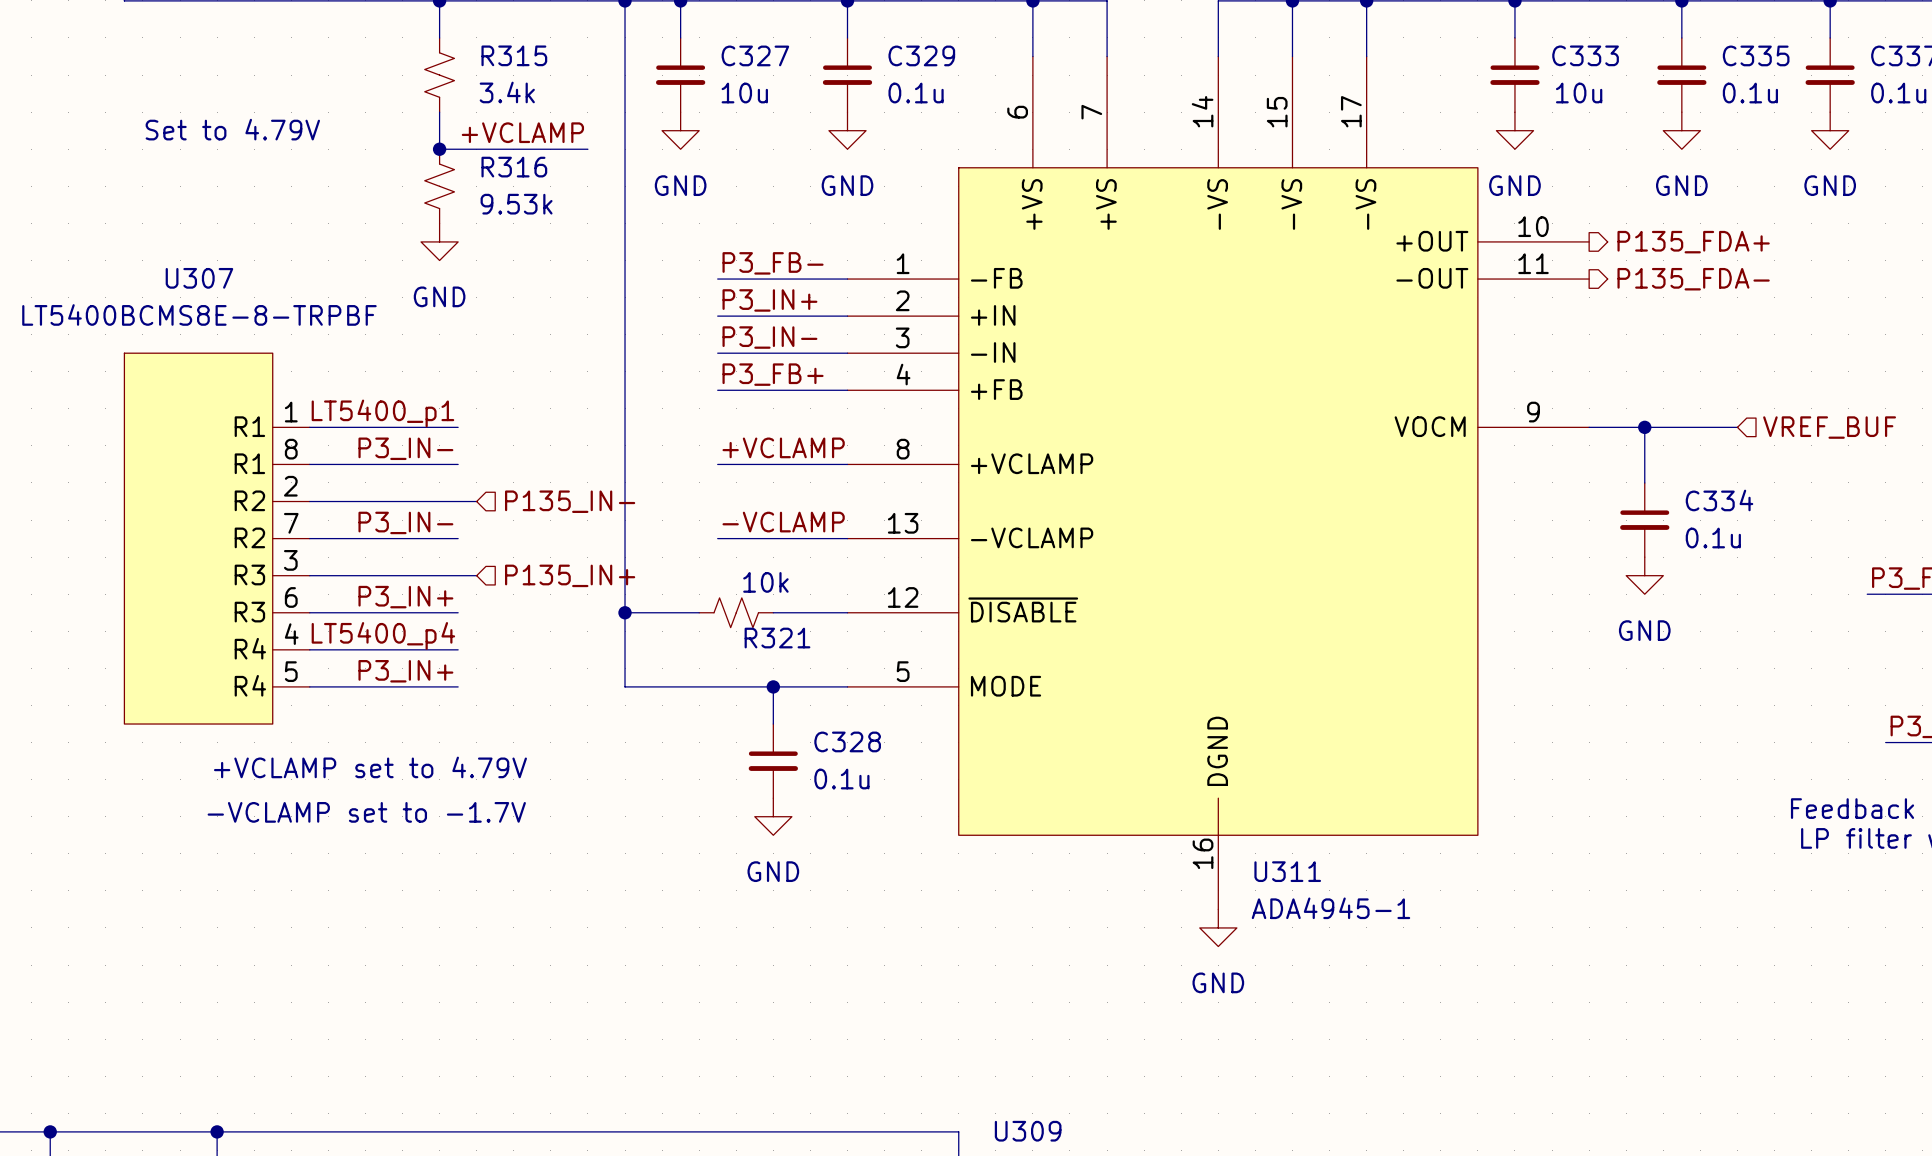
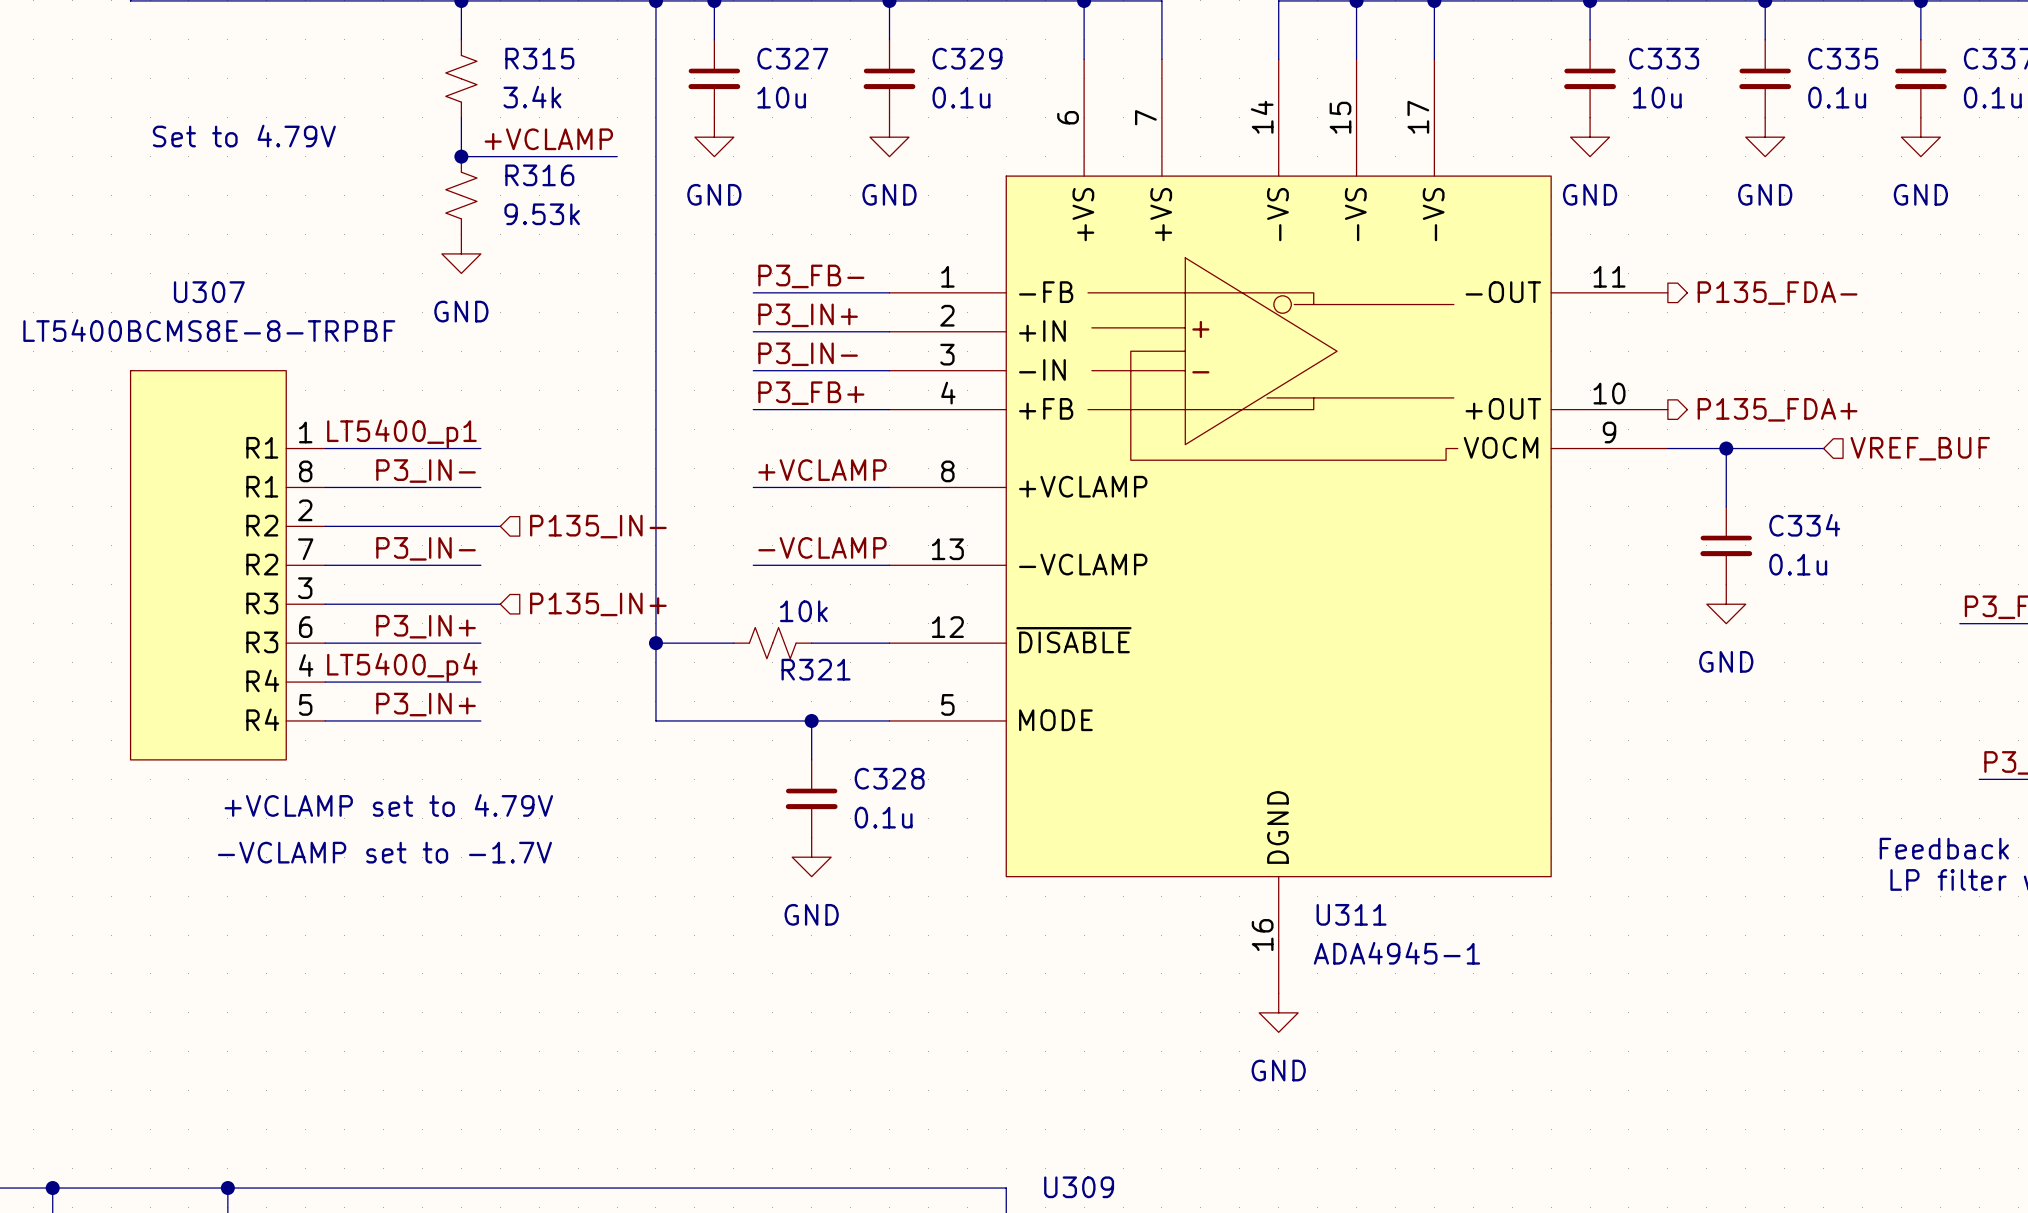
U311 symbol: [847, 56, 1590, 910] -> [889, 59, 1668, 994]
hierarchical label position: P135_FDA+ (1693, 242) -> P135_FDA+ (1777, 409)
power symbol position: GND (1218, 927) -> GND (1278, 1012)

